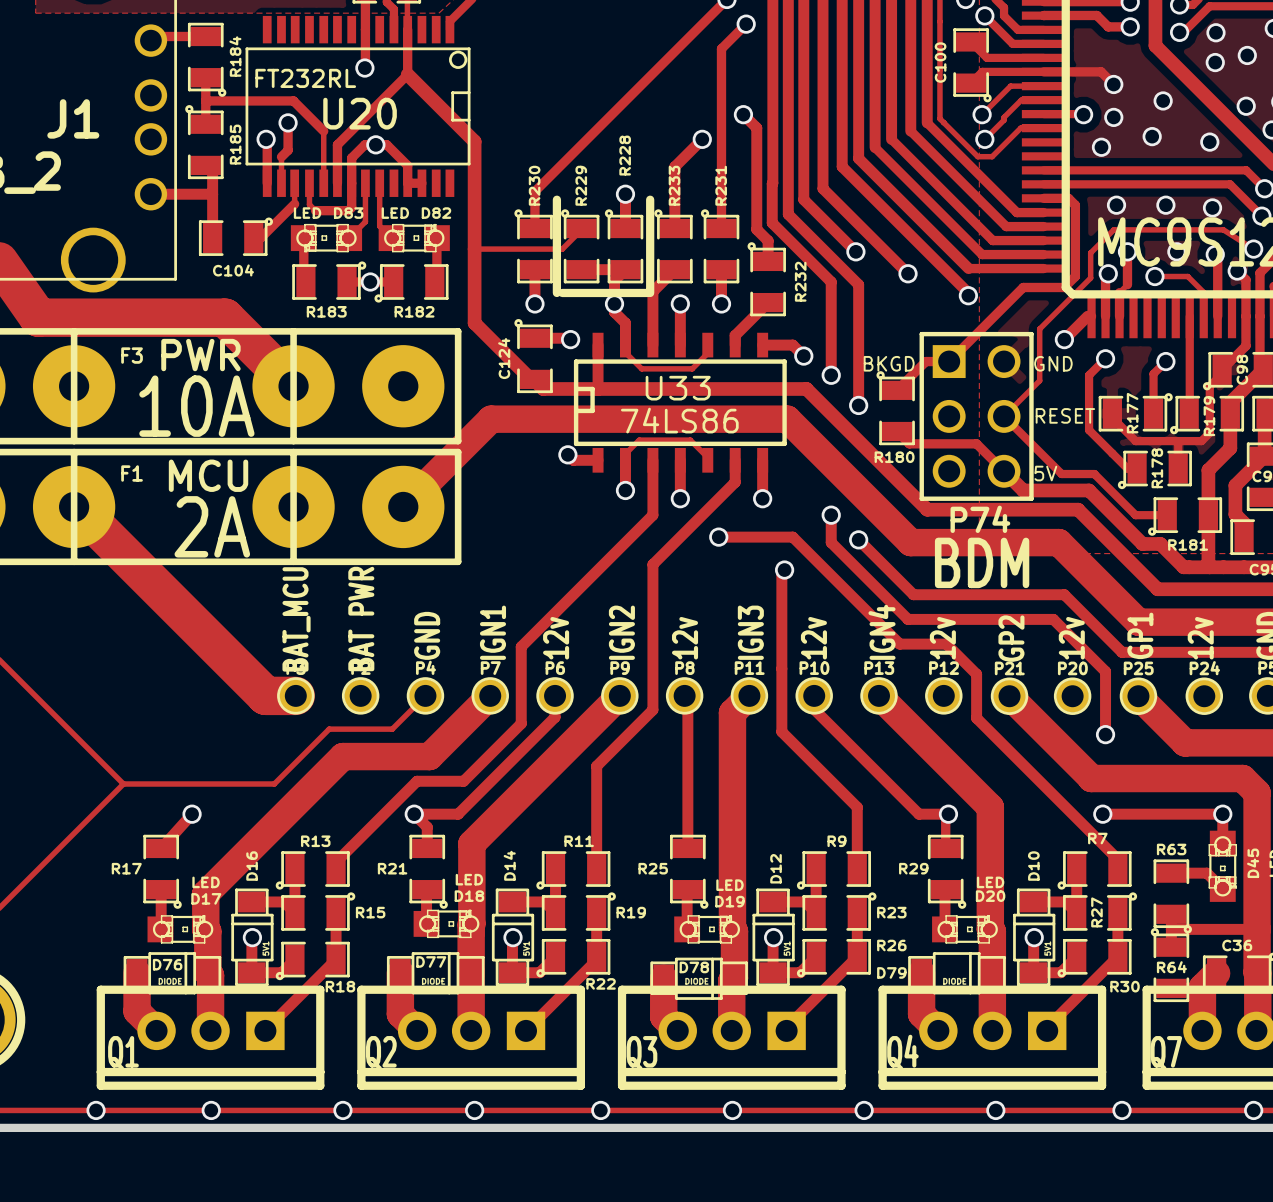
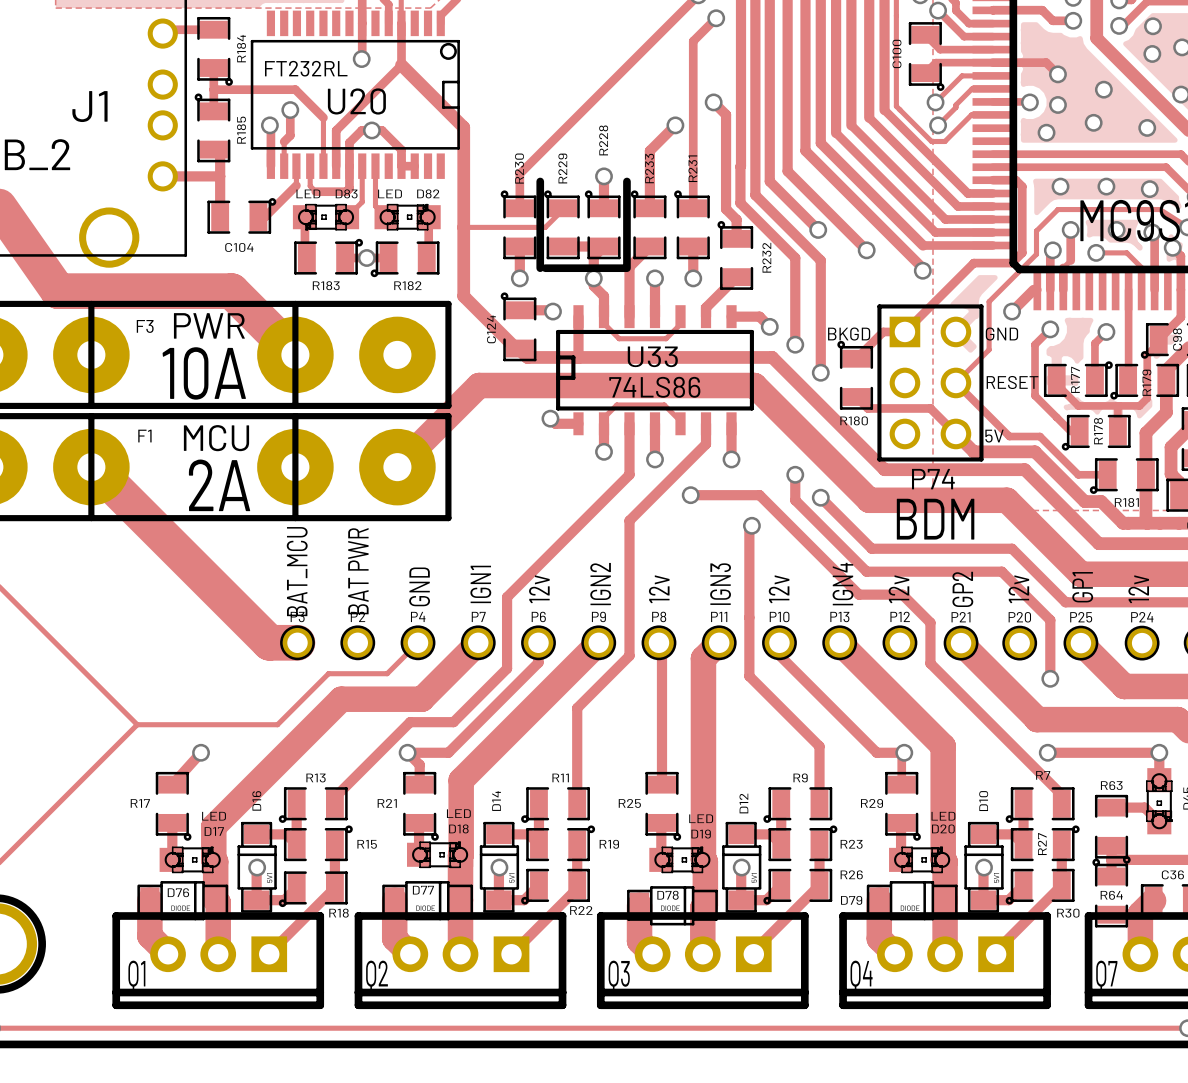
via: (96, 1110) -> none
via: (211, 1110) -> none
via: (342, 1110) -> none
via: (474, 1110) -> none
via: (600, 1110) -> none
via: (732, 1110) -> none
via: (864, 1110) -> none
via: (995, 1110) -> none
via: (1122, 1110) -> none

